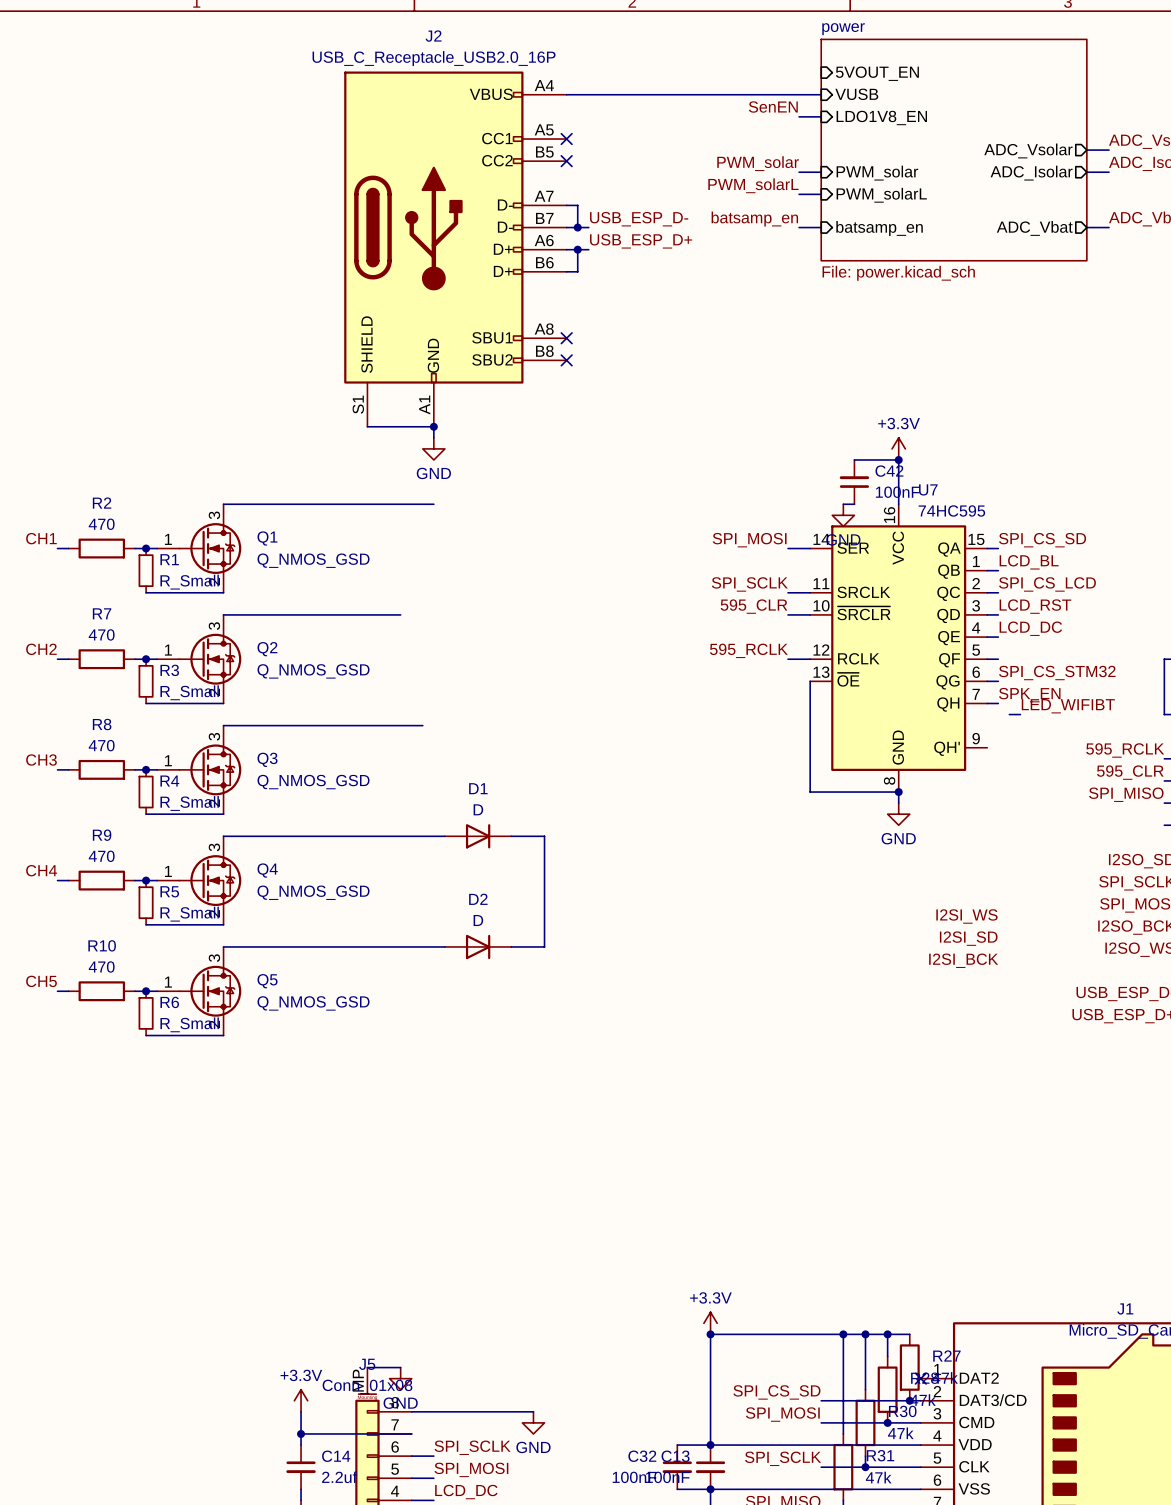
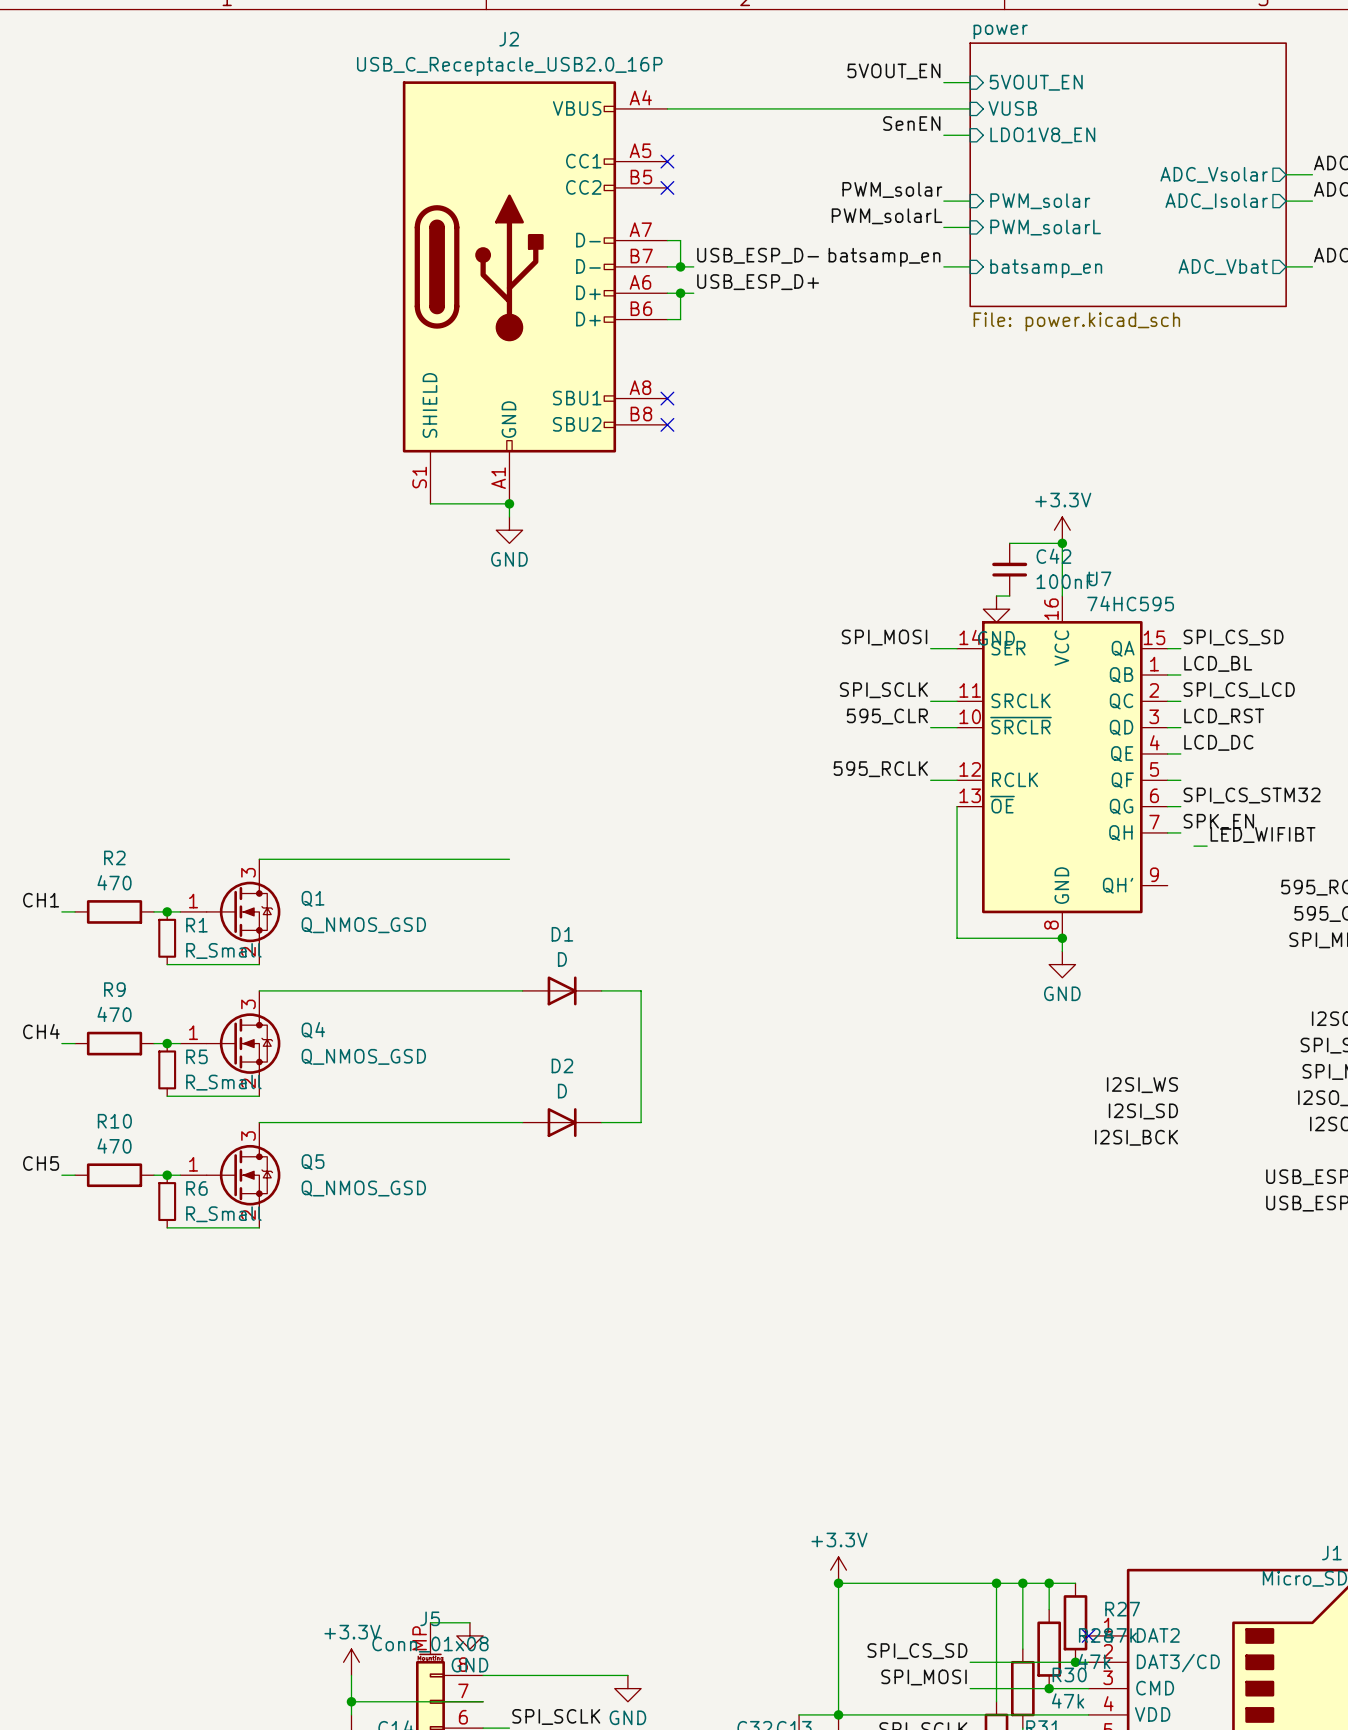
label: none -> 5VOUT_EN (893, 71)
wire: none -> (943, 82) (970, 82)
wire: (223, 504) (433, 504) -> none
label: CH1 (41, 538) -> none
wire: (57, 548) (68, 548) -> none
R2: 470 (101, 548) -> none
wire: (135, 548) (157, 548) -> none
junction: (146, 548) -> none
Q1: Q_NMOS_GSD (199, 548) -> none
R1: R_Small (146, 570) -> none
wire: (146, 592) (223, 592) -> none
wire: (223, 614) (400, 614) -> none
label: CH2 (41, 649) -> none
wire: (57, 659) (68, 659) -> none
R7: 470 (101, 659) -> none
wire: (135, 659) (157, 659) -> none
junction: (146, 659) -> none
Q2: Q_NMOS_GSD (199, 659) -> none
R3: R_Small (146, 681) -> none
wire: (146, 703) (223, 703) -> none
R8 name: R8 (102, 724) -> R2 (114, 857)
wire: none -> (496, 859) (509, 859)
Q3 name: Q3 (267, 759) -> Q1 (313, 898)
label: CH3 (41, 760) -> CH1 (41, 900)
R4 name: R4 (169, 781) -> R1 (196, 925)

